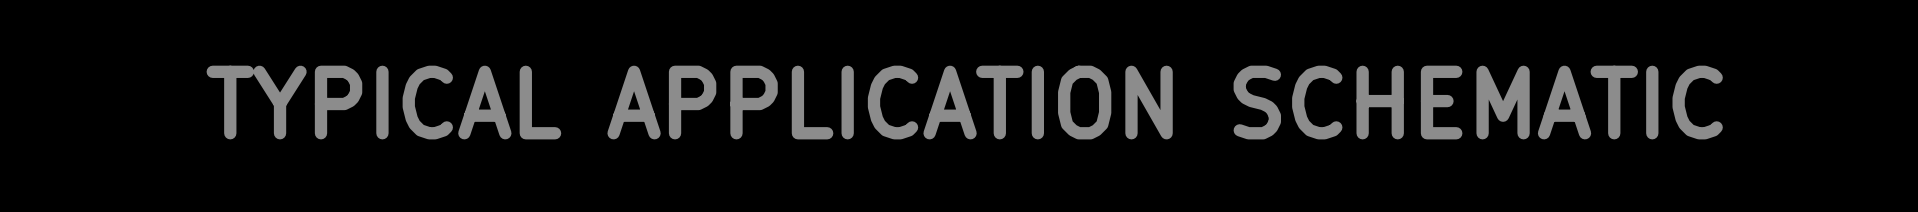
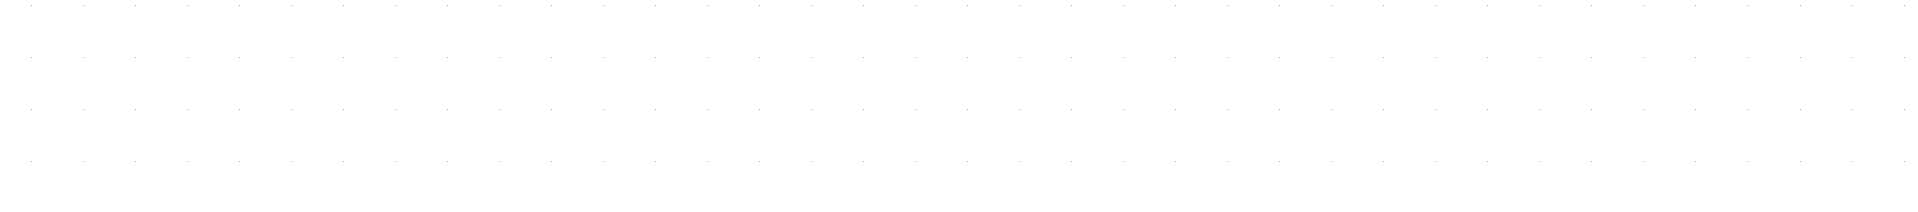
text: TYPICAL APPLICATION SCHEMATIC (964, 102) -> none

